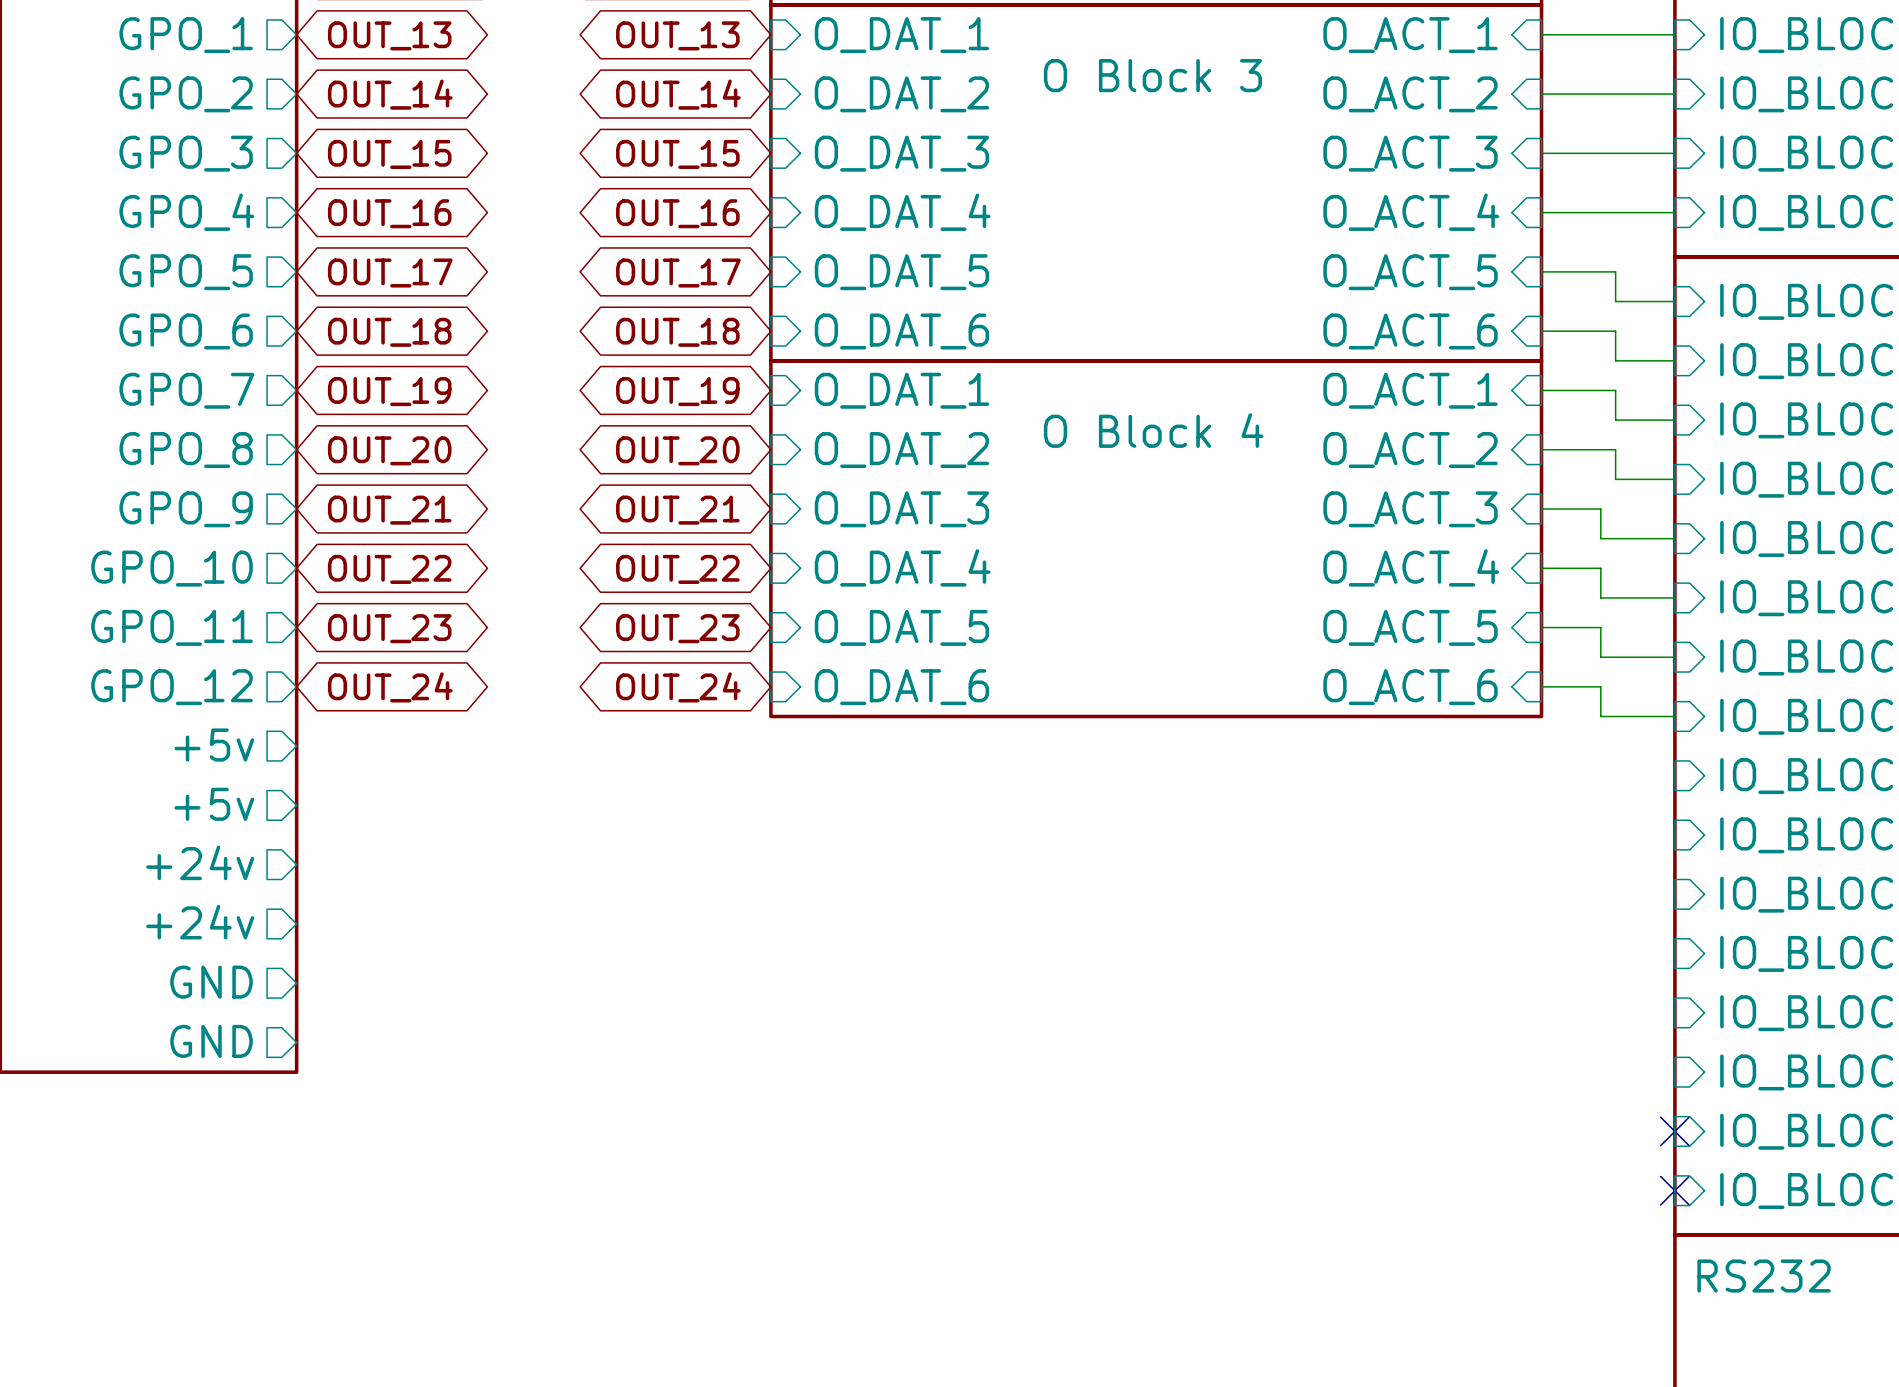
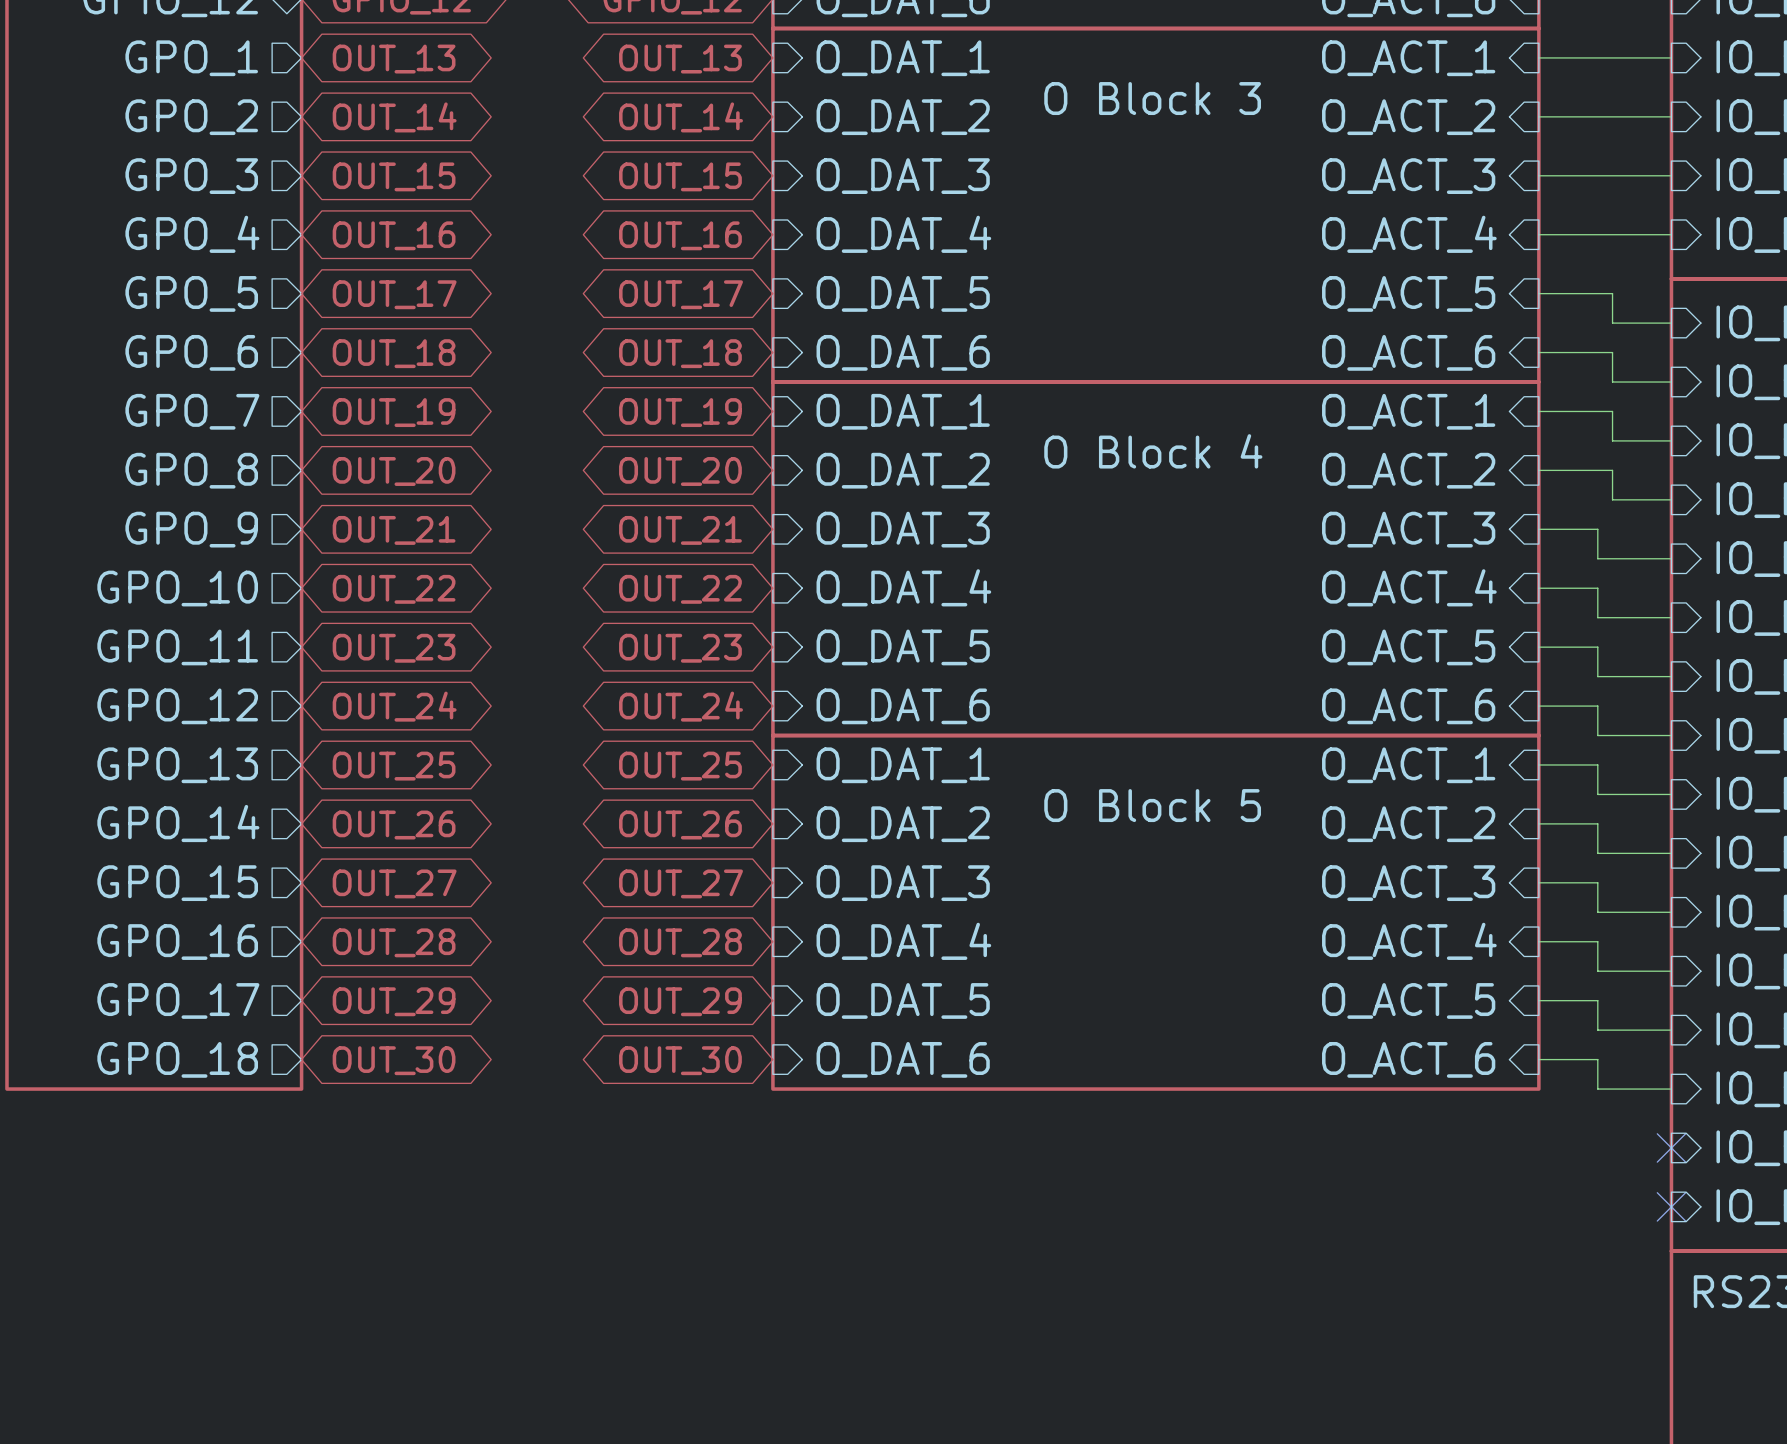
sheet pin: +5v (214, 745) -> GPO_13 (177, 765)
sheet pin: none -> O_DAT_1 (903, 765)
sheet pin: none -> O_ACT_1 (1408, 765)
wire: none -> (1538, 764) (1597, 764) (1597, 794) (1671, 794)
global label: none -> OUT_25 (394, 766)
global label: none -> OUT_25 (680, 766)
sheet pin: +5v (214, 804) -> GPO_14 (178, 823)
sheet pin: none -> O_DAT_2 (903, 824)
sheet pin: none -> O_ACT_2 (1408, 824)
wire: none -> (1538, 823) (1597, 823) (1597, 853) (1671, 853)
global label: none -> OUT_26 (394, 825)
global label: none -> OUT_26 (680, 825)
sheet pin: +24v (200, 862) -> GPO_15 (177, 883)
sheet pin: none -> O_DAT_3 (903, 883)
sheet pin: none -> O_ACT_3 (1408, 883)
wire: none -> (1538, 882) (1597, 882) (1597, 912) (1671, 912)
global label: none -> OUT_27 (394, 883)
global label: none -> OUT_27 (680, 883)
sheet O Block 5: none -> (1155, 912)
sheet pin: +24v (200, 922) -> GPO_16 (177, 942)
sheet pin: none -> O_DAT_4 (903, 941)
sheet pin: none -> O_ACT_4 (1409, 941)
wire: none -> (1538, 941) (1597, 941) (1597, 971) (1671, 971)
global label: none -> OUT_28 (394, 942)
global label: none -> OUT_28 (680, 942)
sheet pin: GND (211, 982) -> GPO_17 (178, 1000)
sheet pin: none -> O_DAT_5 (903, 1000)
sheet pin: none -> O_ACT_5 (1408, 1000)
wire: none -> (1538, 1000) (1597, 1000) (1597, 1030) (1671, 1030)
global label: none -> OUT_29 (394, 1001)
global label: none -> OUT_29 (680, 1001)
sheet pin: GND (211, 1041) -> GPO_18 (177, 1059)
sheet pin: none -> O_DAT_6 (903, 1059)
sheet pin: none -> O_ACT_6 (1408, 1059)
wire: none -> (1538, 1059) (1597, 1059) (1597, 1089) (1671, 1089)
global label: none -> OUT_30 (394, 1060)
global label: none -> OUT_30 (680, 1060)

